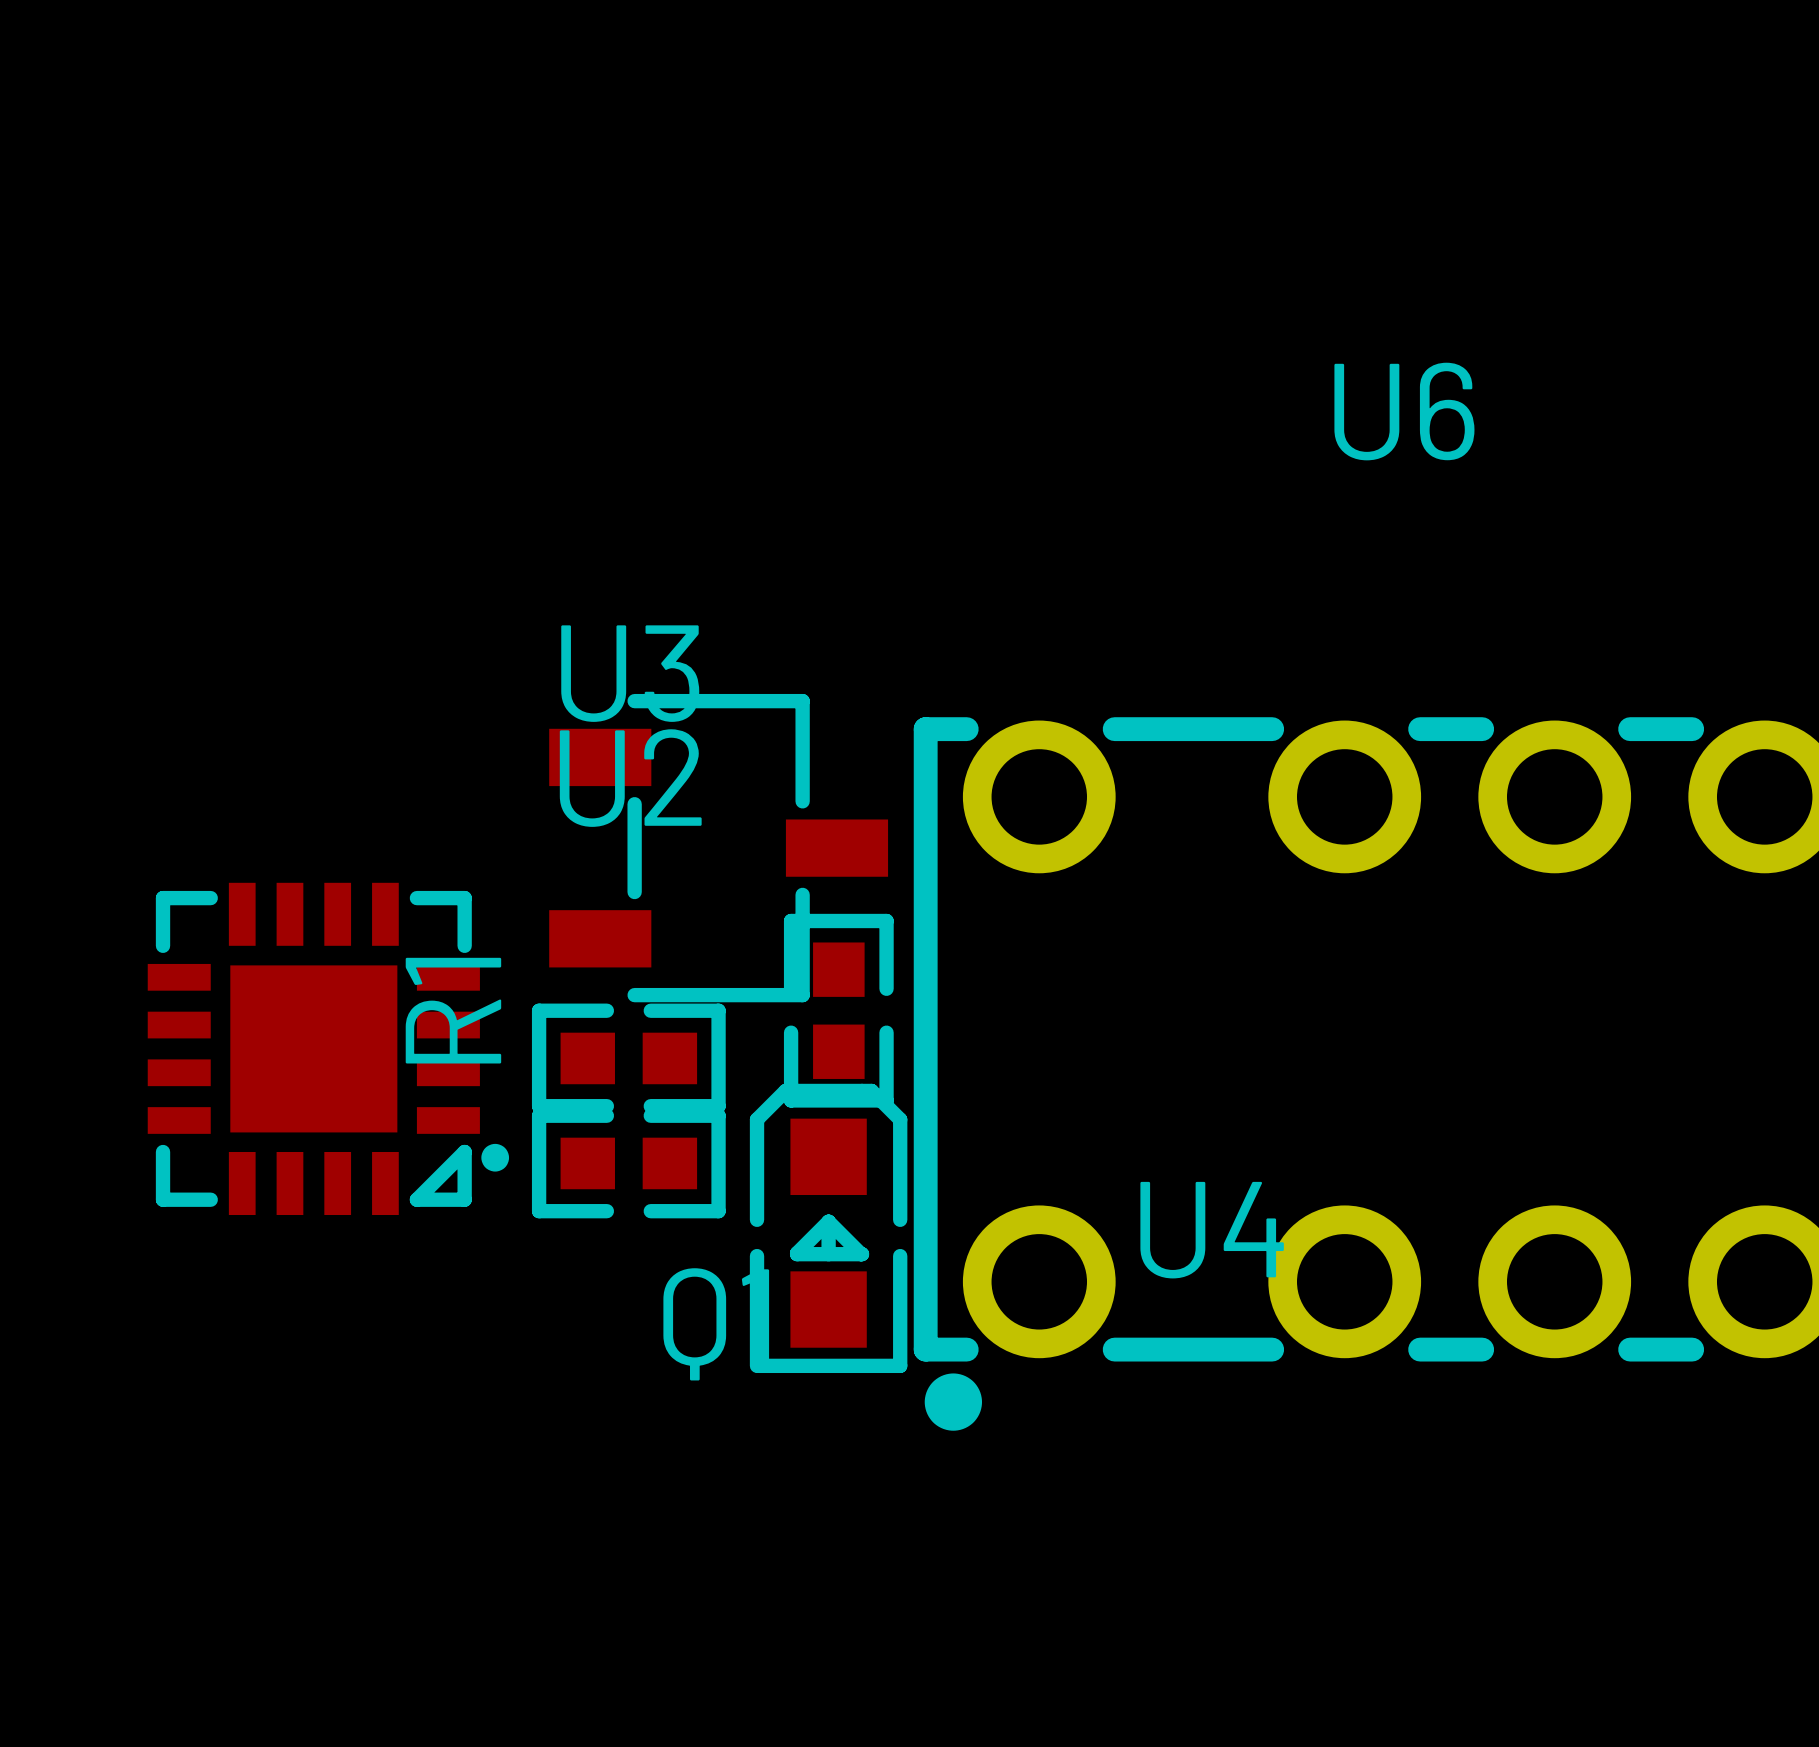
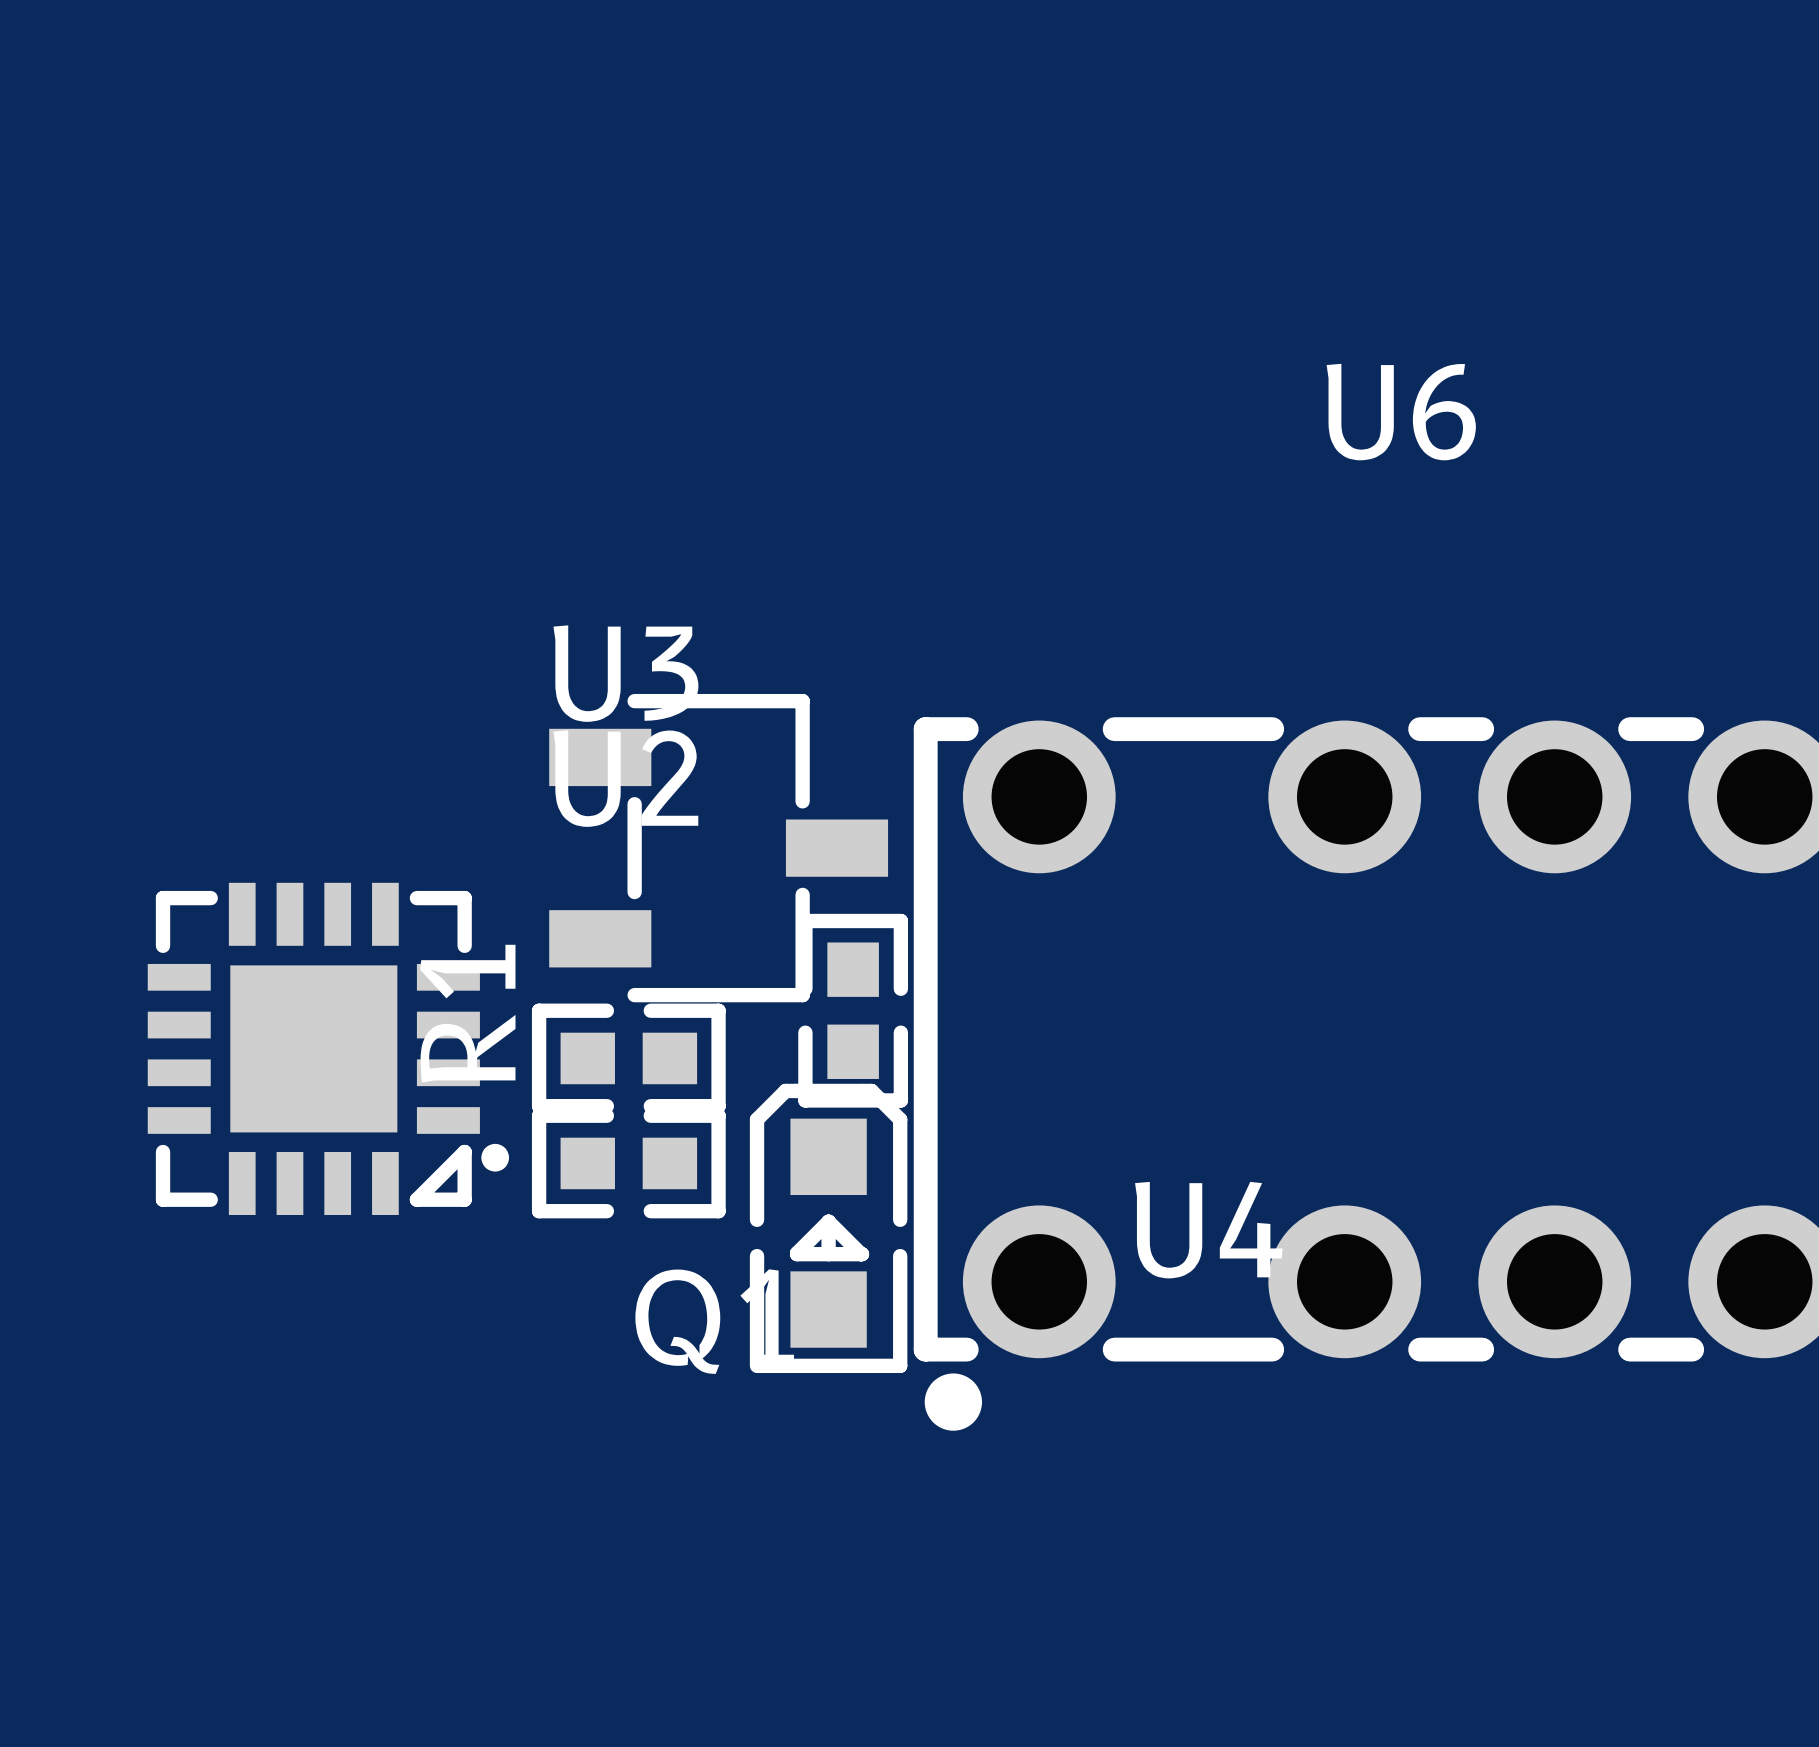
R1 position: (838, 1010) -> (853, 1010)

